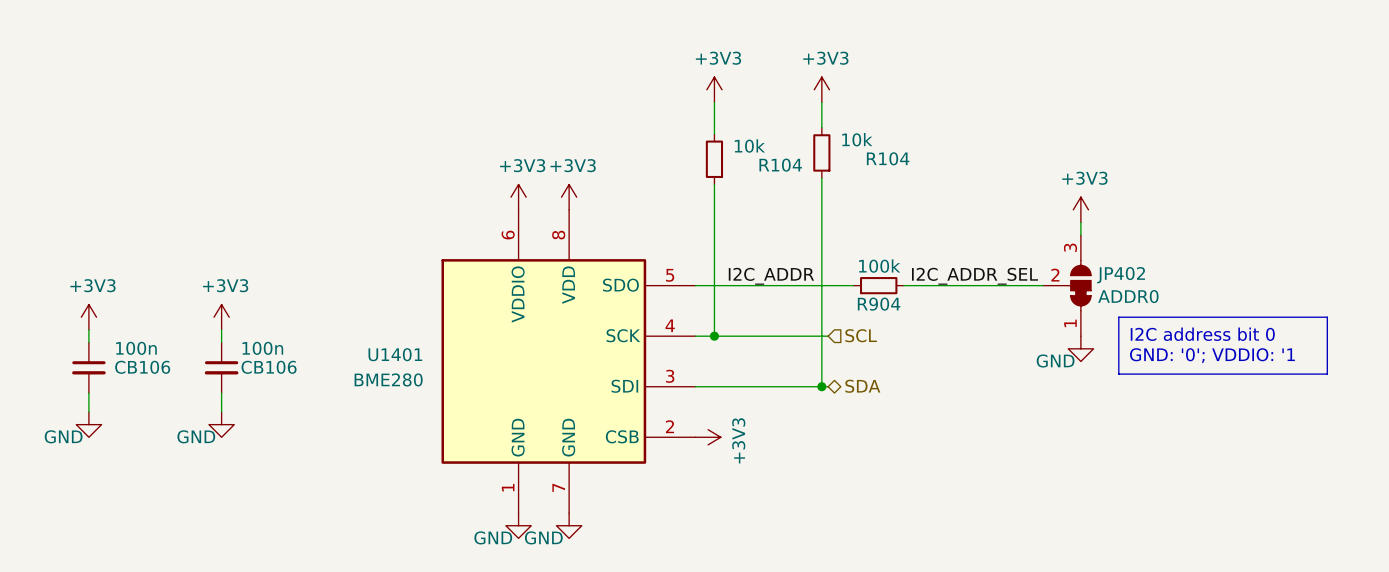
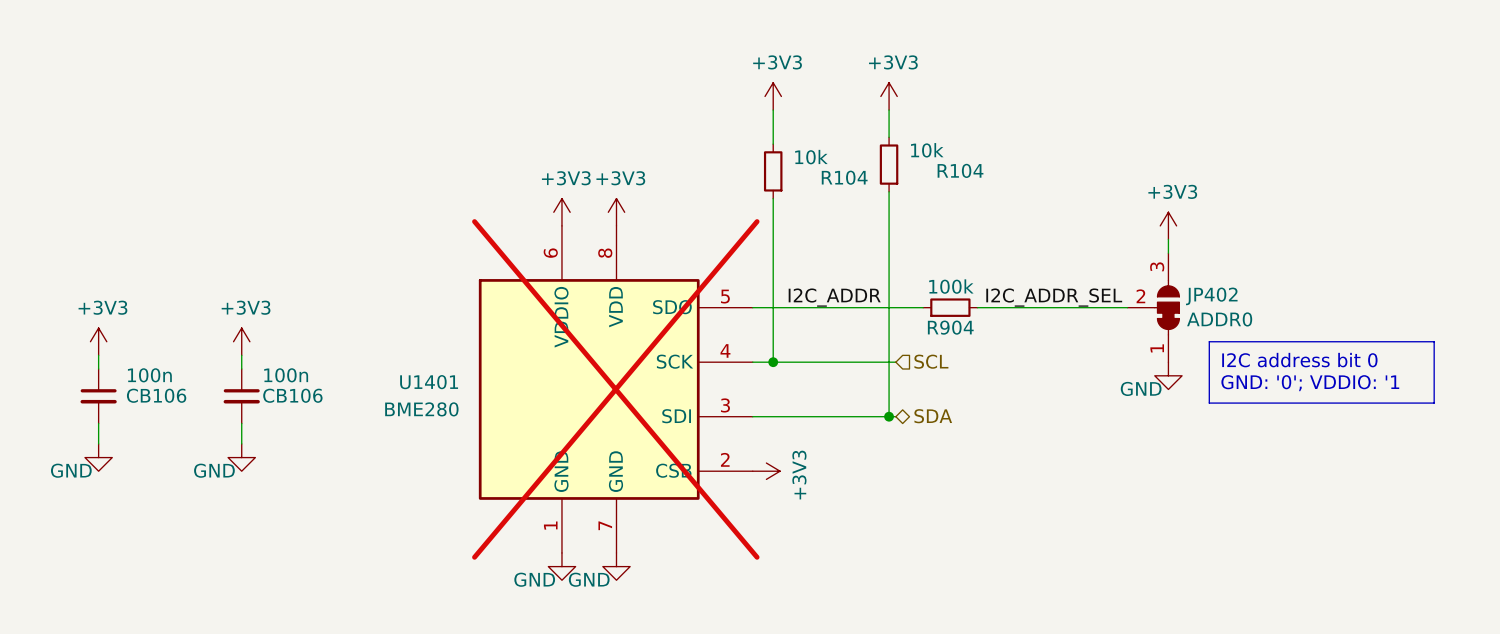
U1401 do-not-place cross: none -> (615, 389)

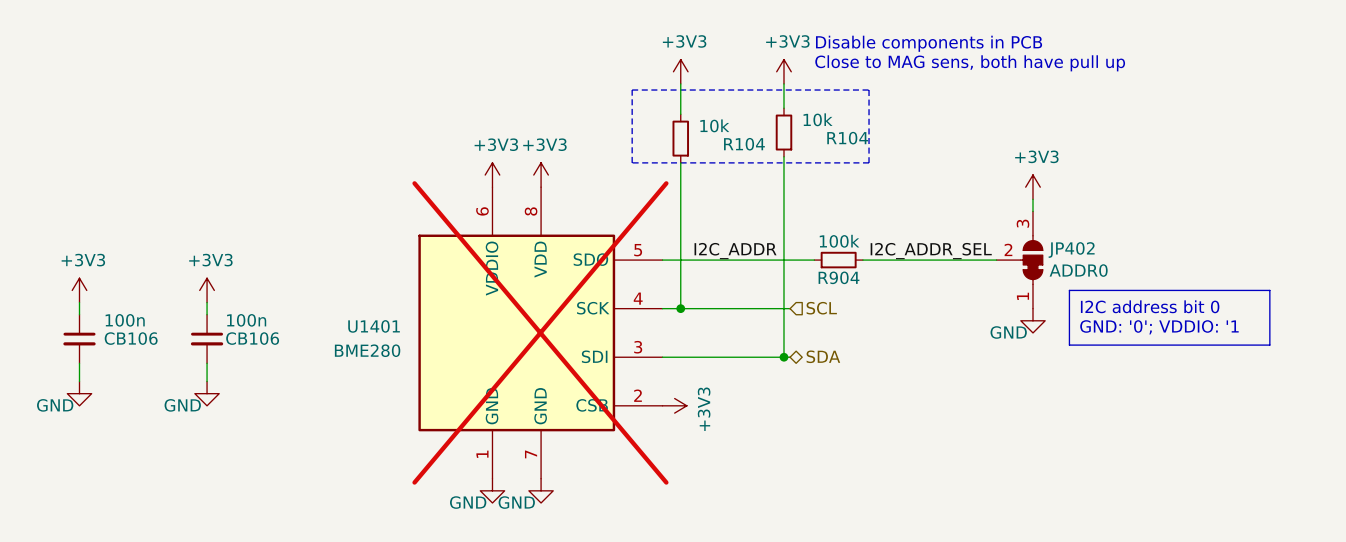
text: none -> Disable components in PCB (929, 43)
text: none -> Close to MAG sens, both have pull up (970, 63)
line: none -> (632, 90) (869, 90) (869, 162) (632, 162) (632, 90)

